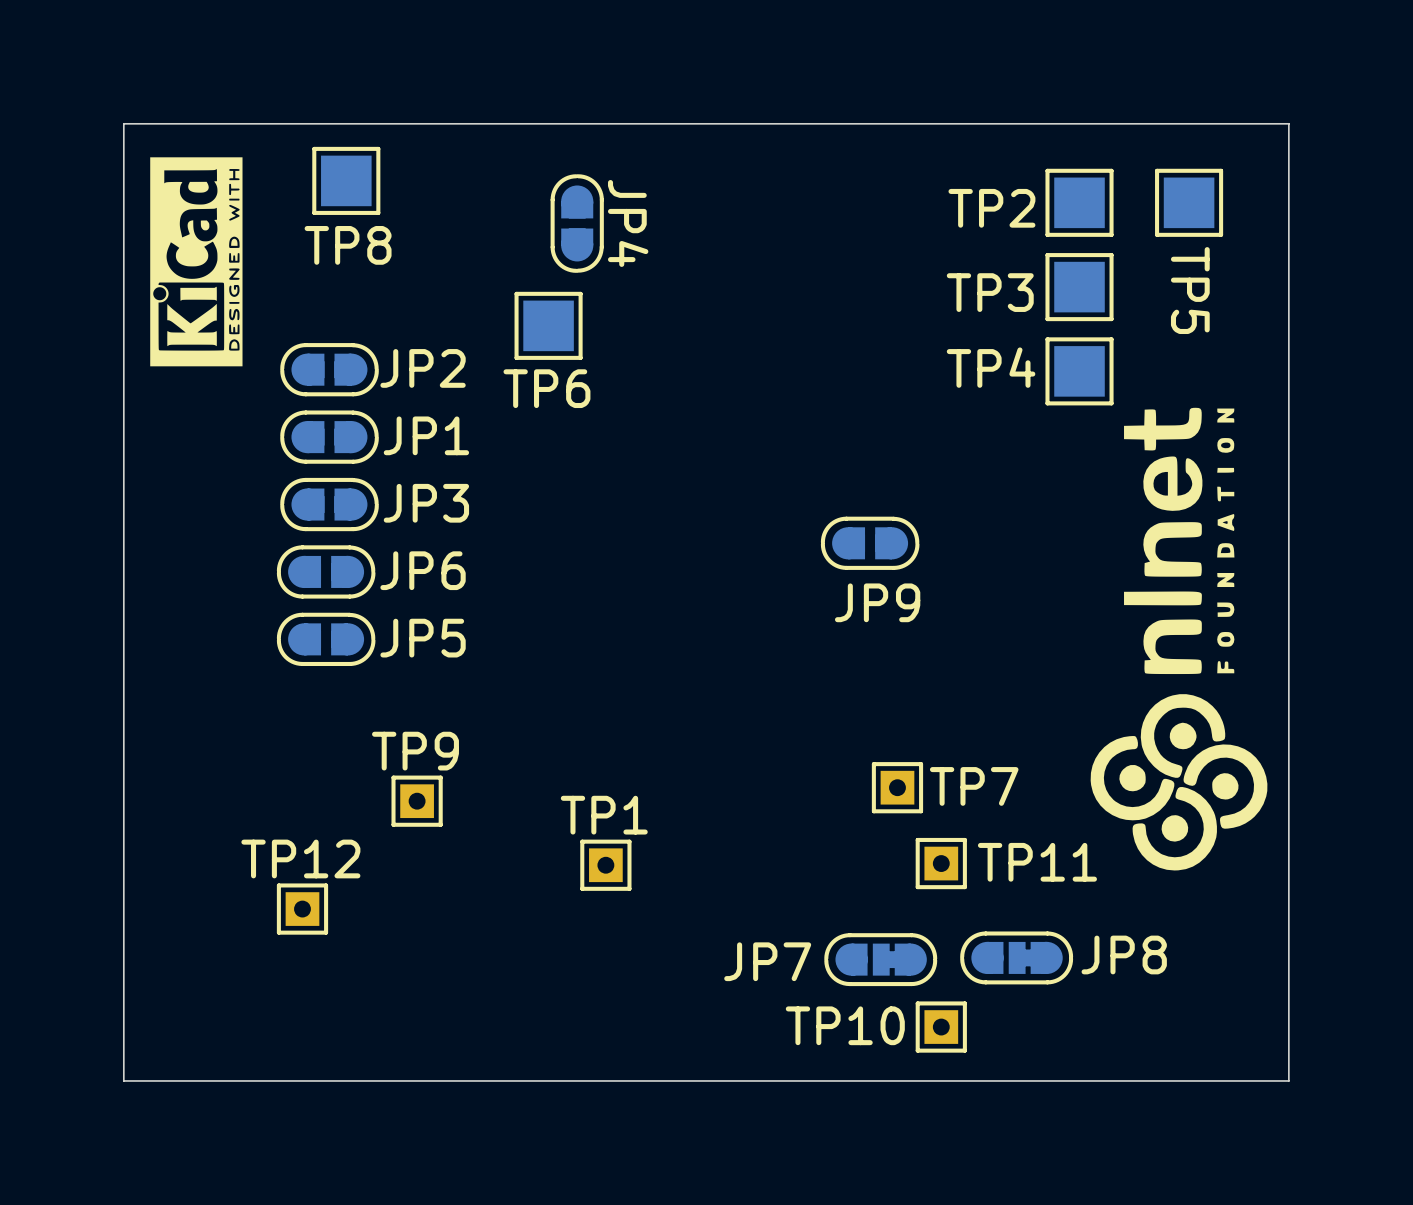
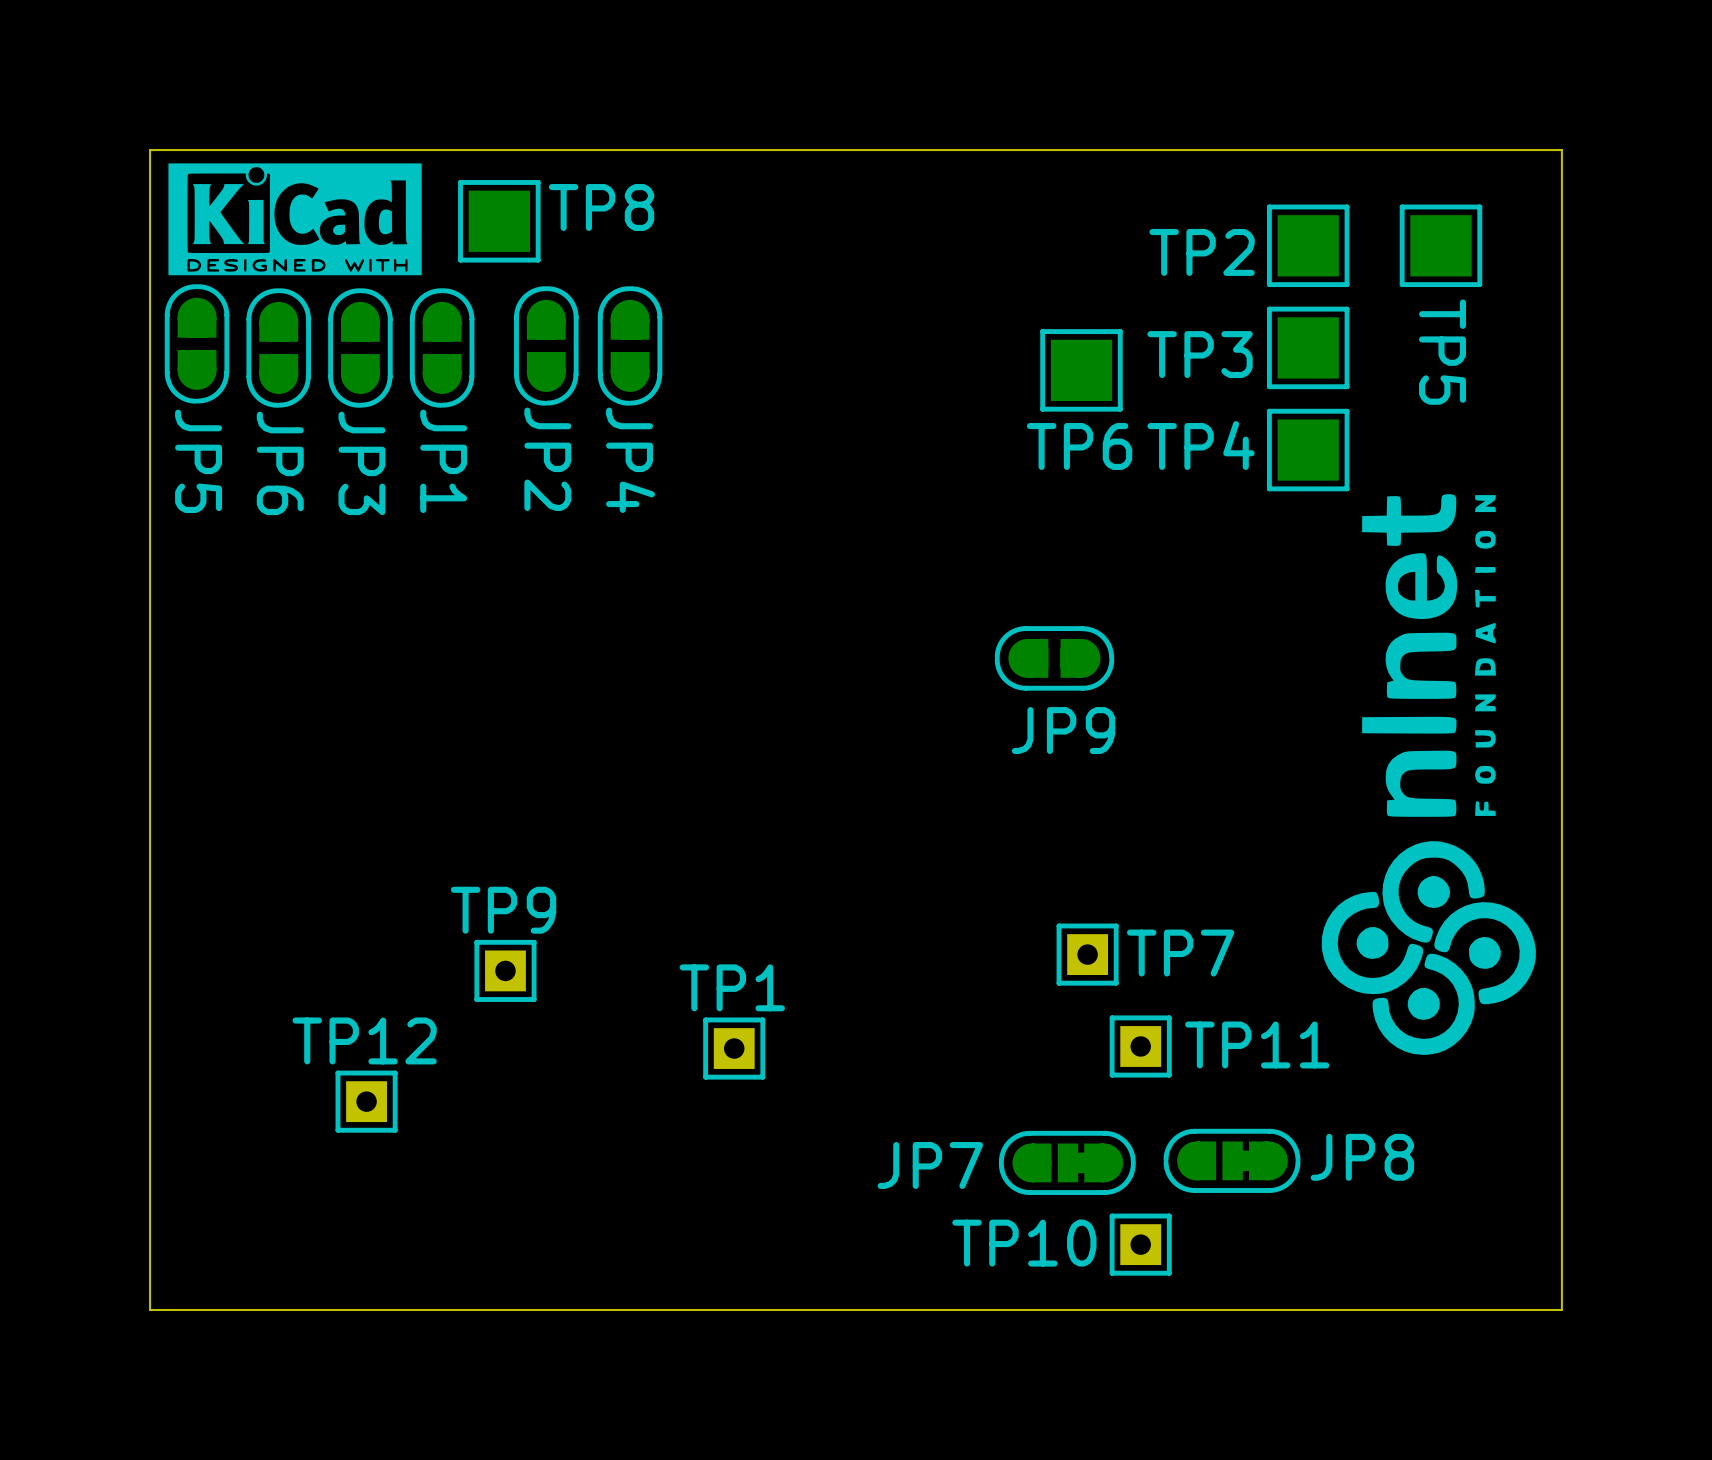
drawing: none -> [168, 163, 422, 276]
drawing: [150, 157, 243, 367] -> none
TP8 position: (346, 180) -> (499, 221)
JP4 position: (577, 223) -> (630, 345)
JP4 name position: JP4 (628, 223) -> JP4 (630, 460)
TP8 name position: TP8 (348, 245) -> TP8 (601, 207)
TP6 position: (548, 325) -> (1081, 370)
JP2 rotation: 0° (329, 369) -> 90° clockwise (546, 345)
JP2 position: (329, 369) -> (546, 345)
JP1 rotation: 0° (329, 437) -> 90° clockwise (442, 348)
JP1 position: (329, 437) -> (442, 348)
JP3 rotation: 0° (329, 504) -> 90° clockwise (360, 348)
JP3 position: (329, 504) -> (360, 348)
JP6 rotation: 0° (326, 571) -> 90° clockwise (278, 348)
JP6 position: (326, 571) -> (278, 348)
JP5 rotation: 0° (326, 639) -> 90° clockwise (197, 343)
JP5 position: (326, 639) -> (197, 343)

